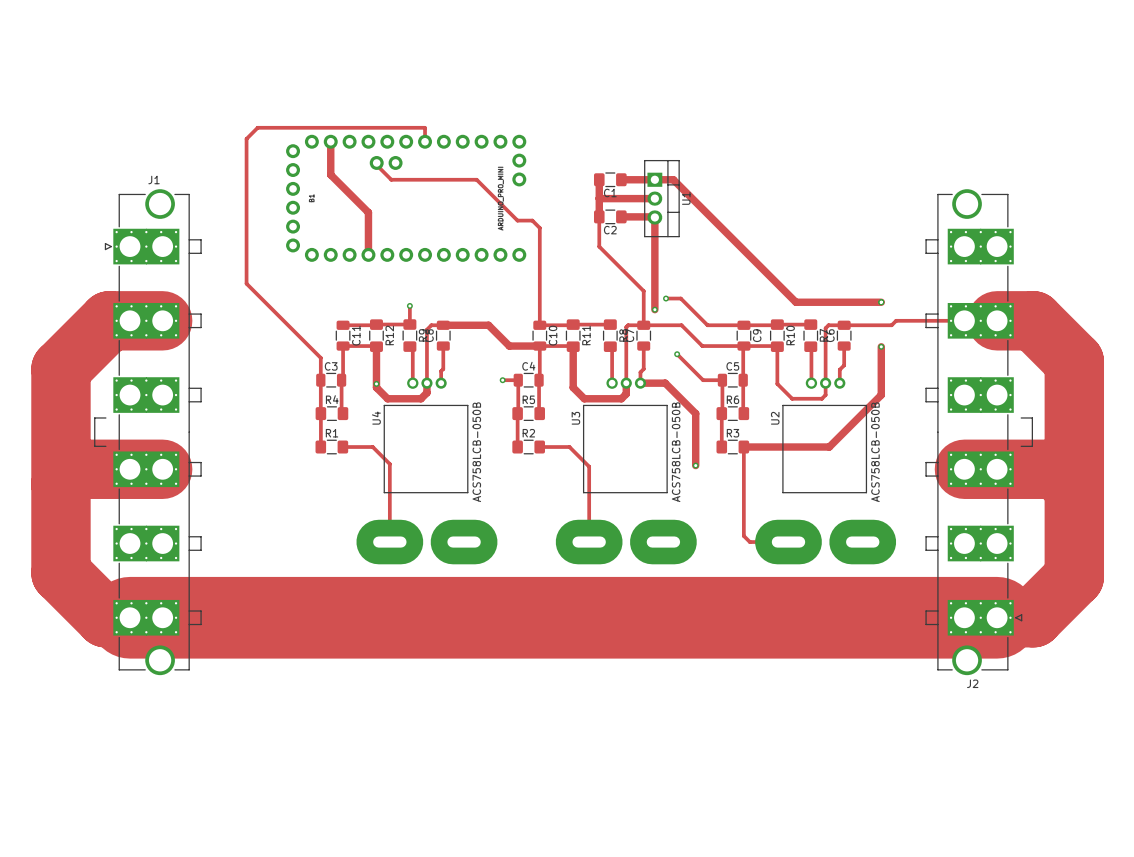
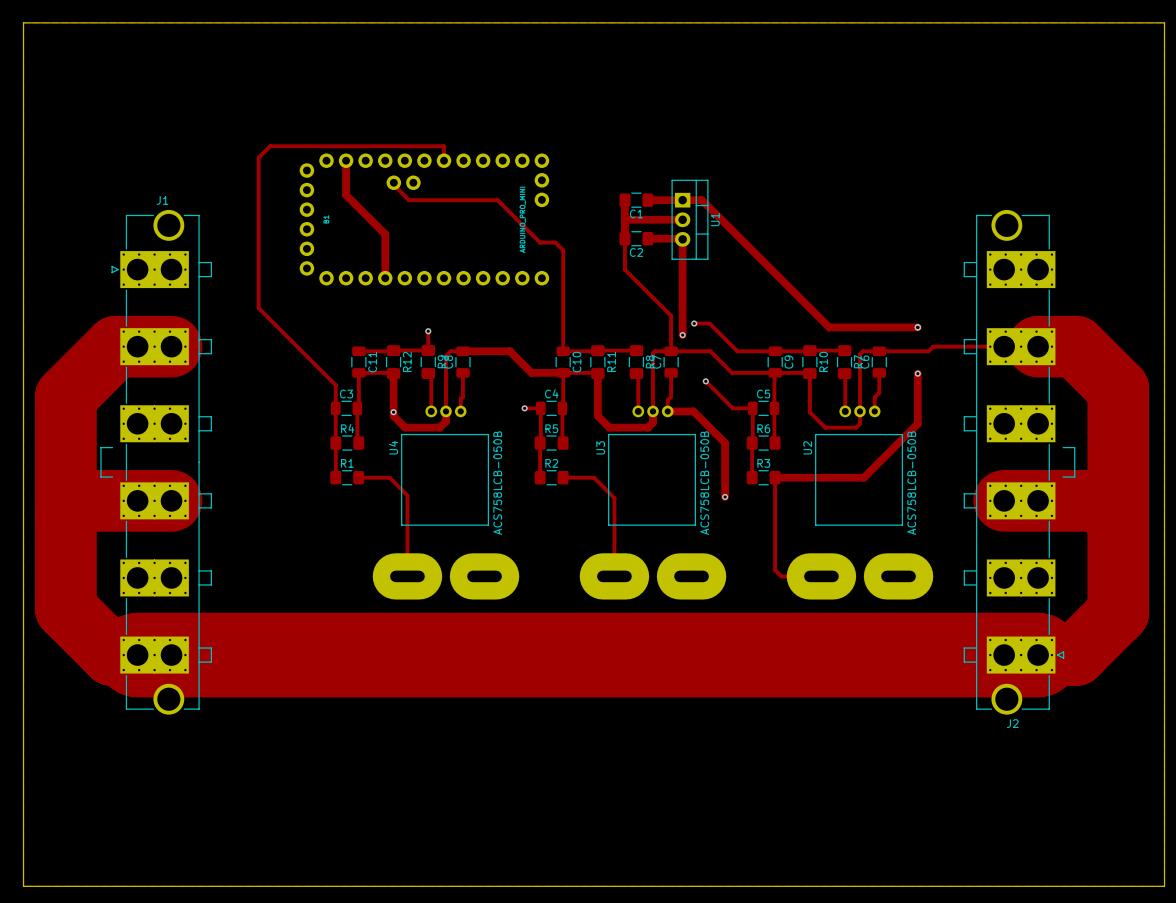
board edge: none -> (23, 22) (23, 886) (1164, 886) (1164, 22) (23, 22)

